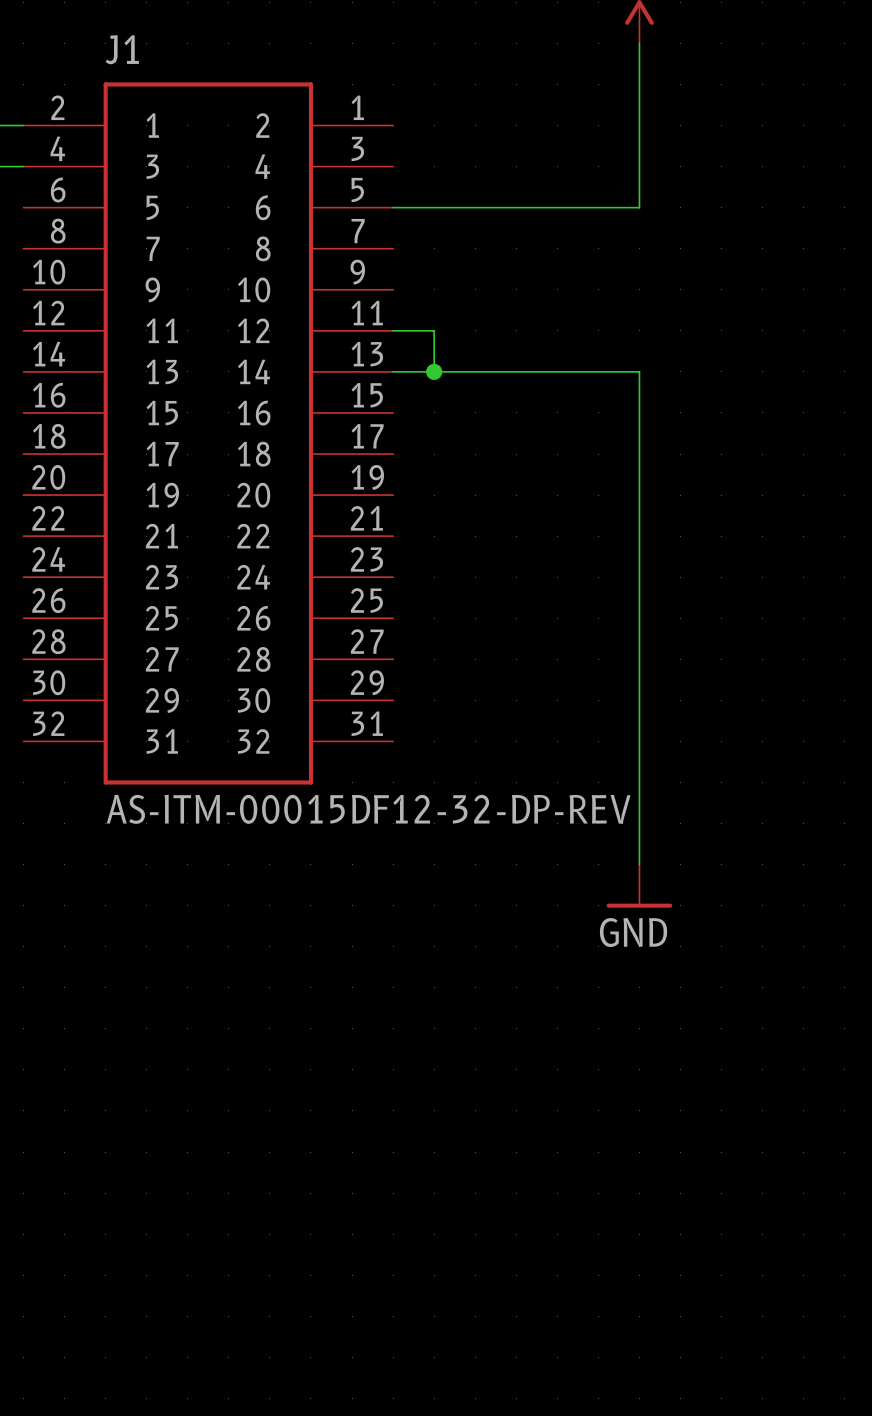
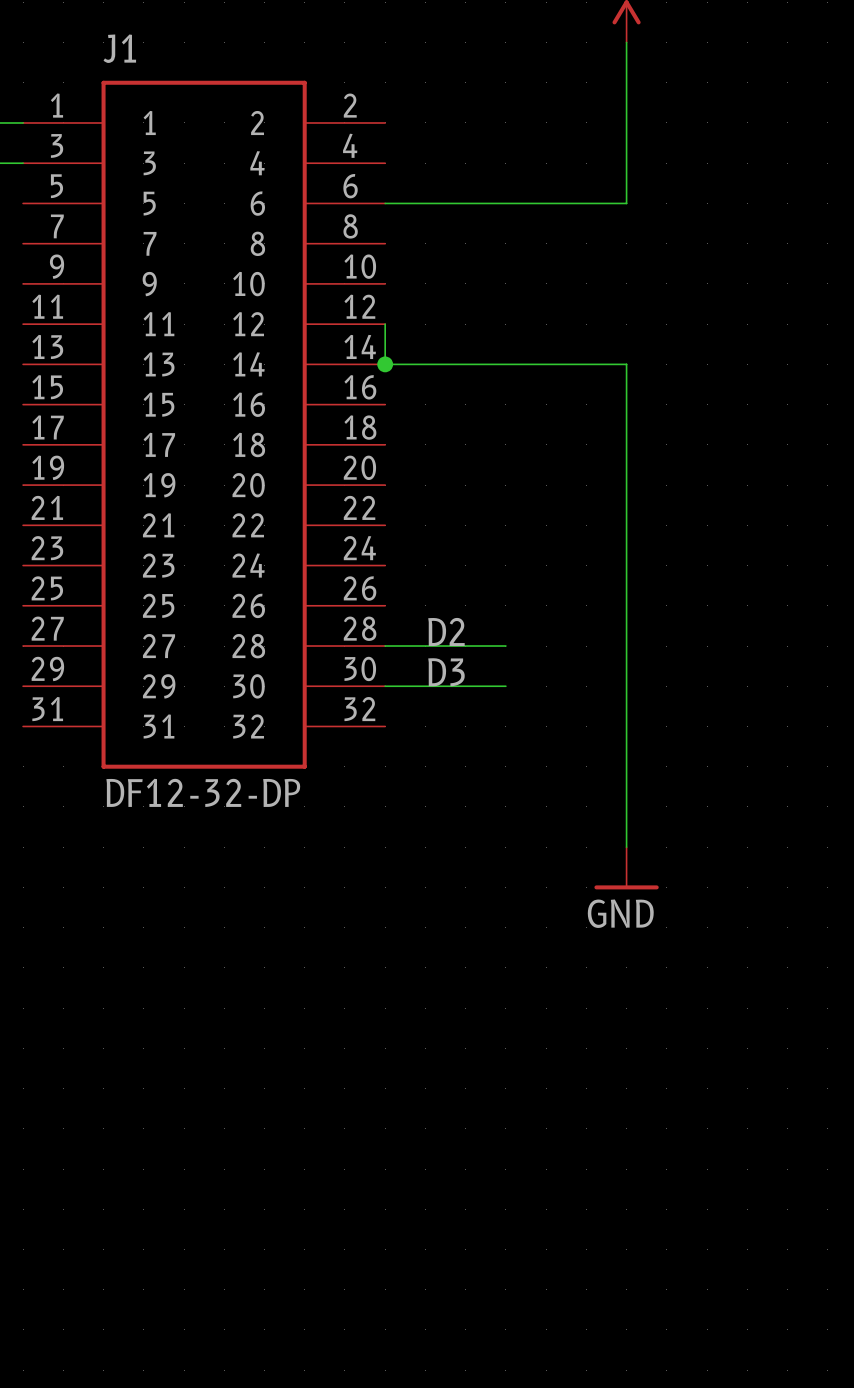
J1 symbol: [23, 82, 394, 785] -> [23, 80, 386, 769]
wire: (393, 330) (434, 330) (434, 371) -> (385, 324) (385, 364)
junction position: (434, 371) -> (385, 364)
label: none -> D2 (446, 631)
wire: none -> (385, 646) (505, 646)
label: none -> D3 (446, 672)
wire: none -> (385, 686) (505, 686)
J1 value: AS-ITM-00015DF12-32-DP-REV (368, 809) -> DF12-32-DP (203, 792)

